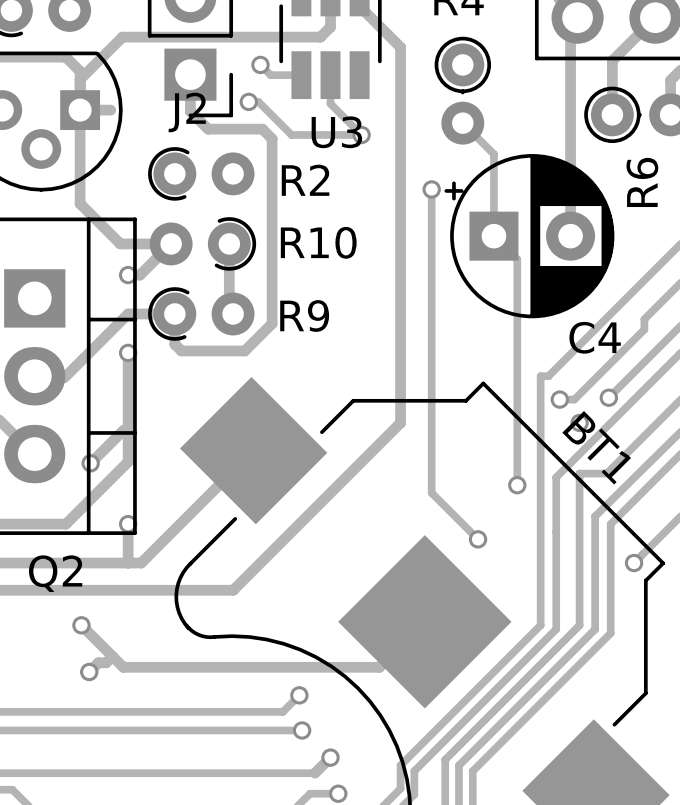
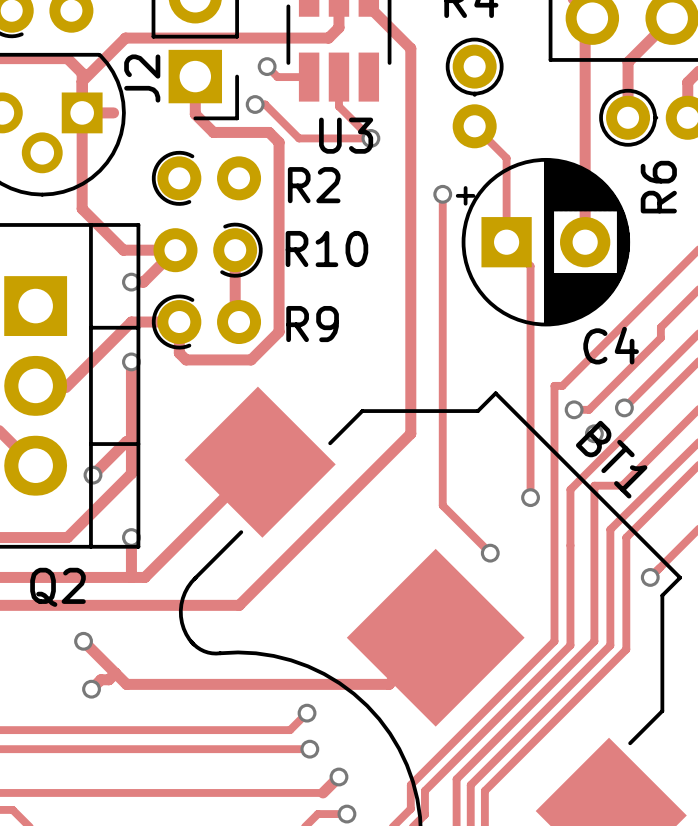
J2 name rotation: 0° (187, 112) -> 90° counterclockwise (142, 78)

